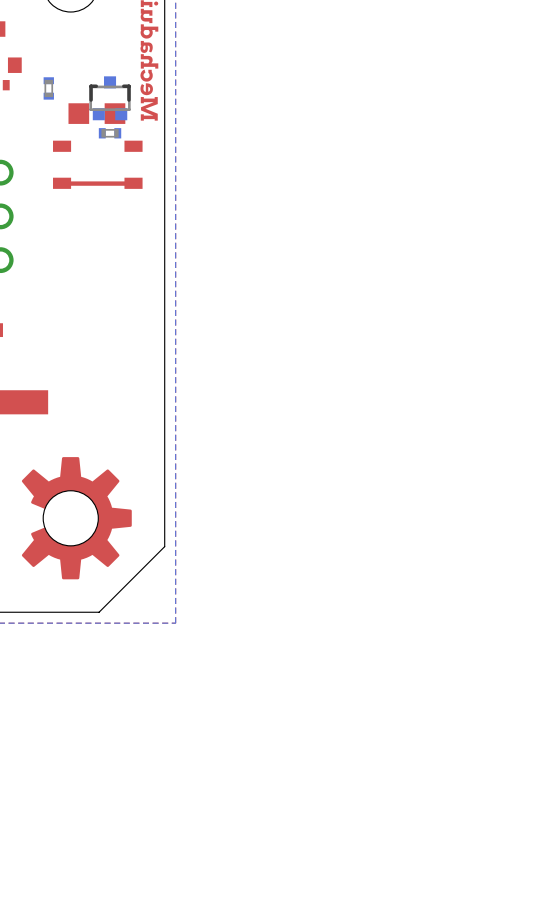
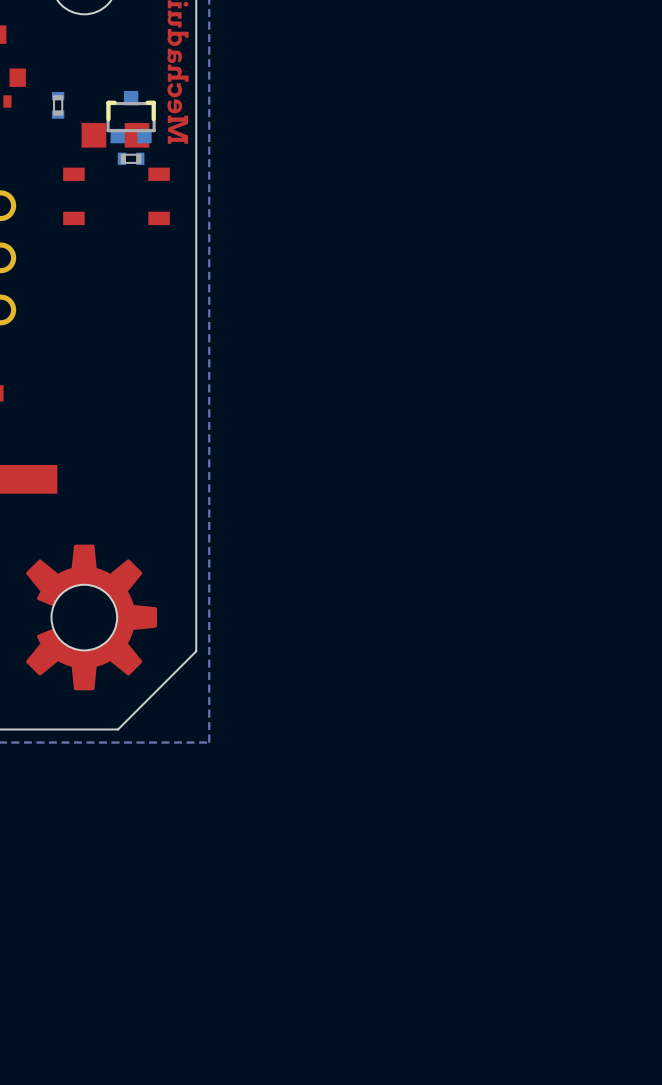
top track: (133, 183) (62, 183) -> none

